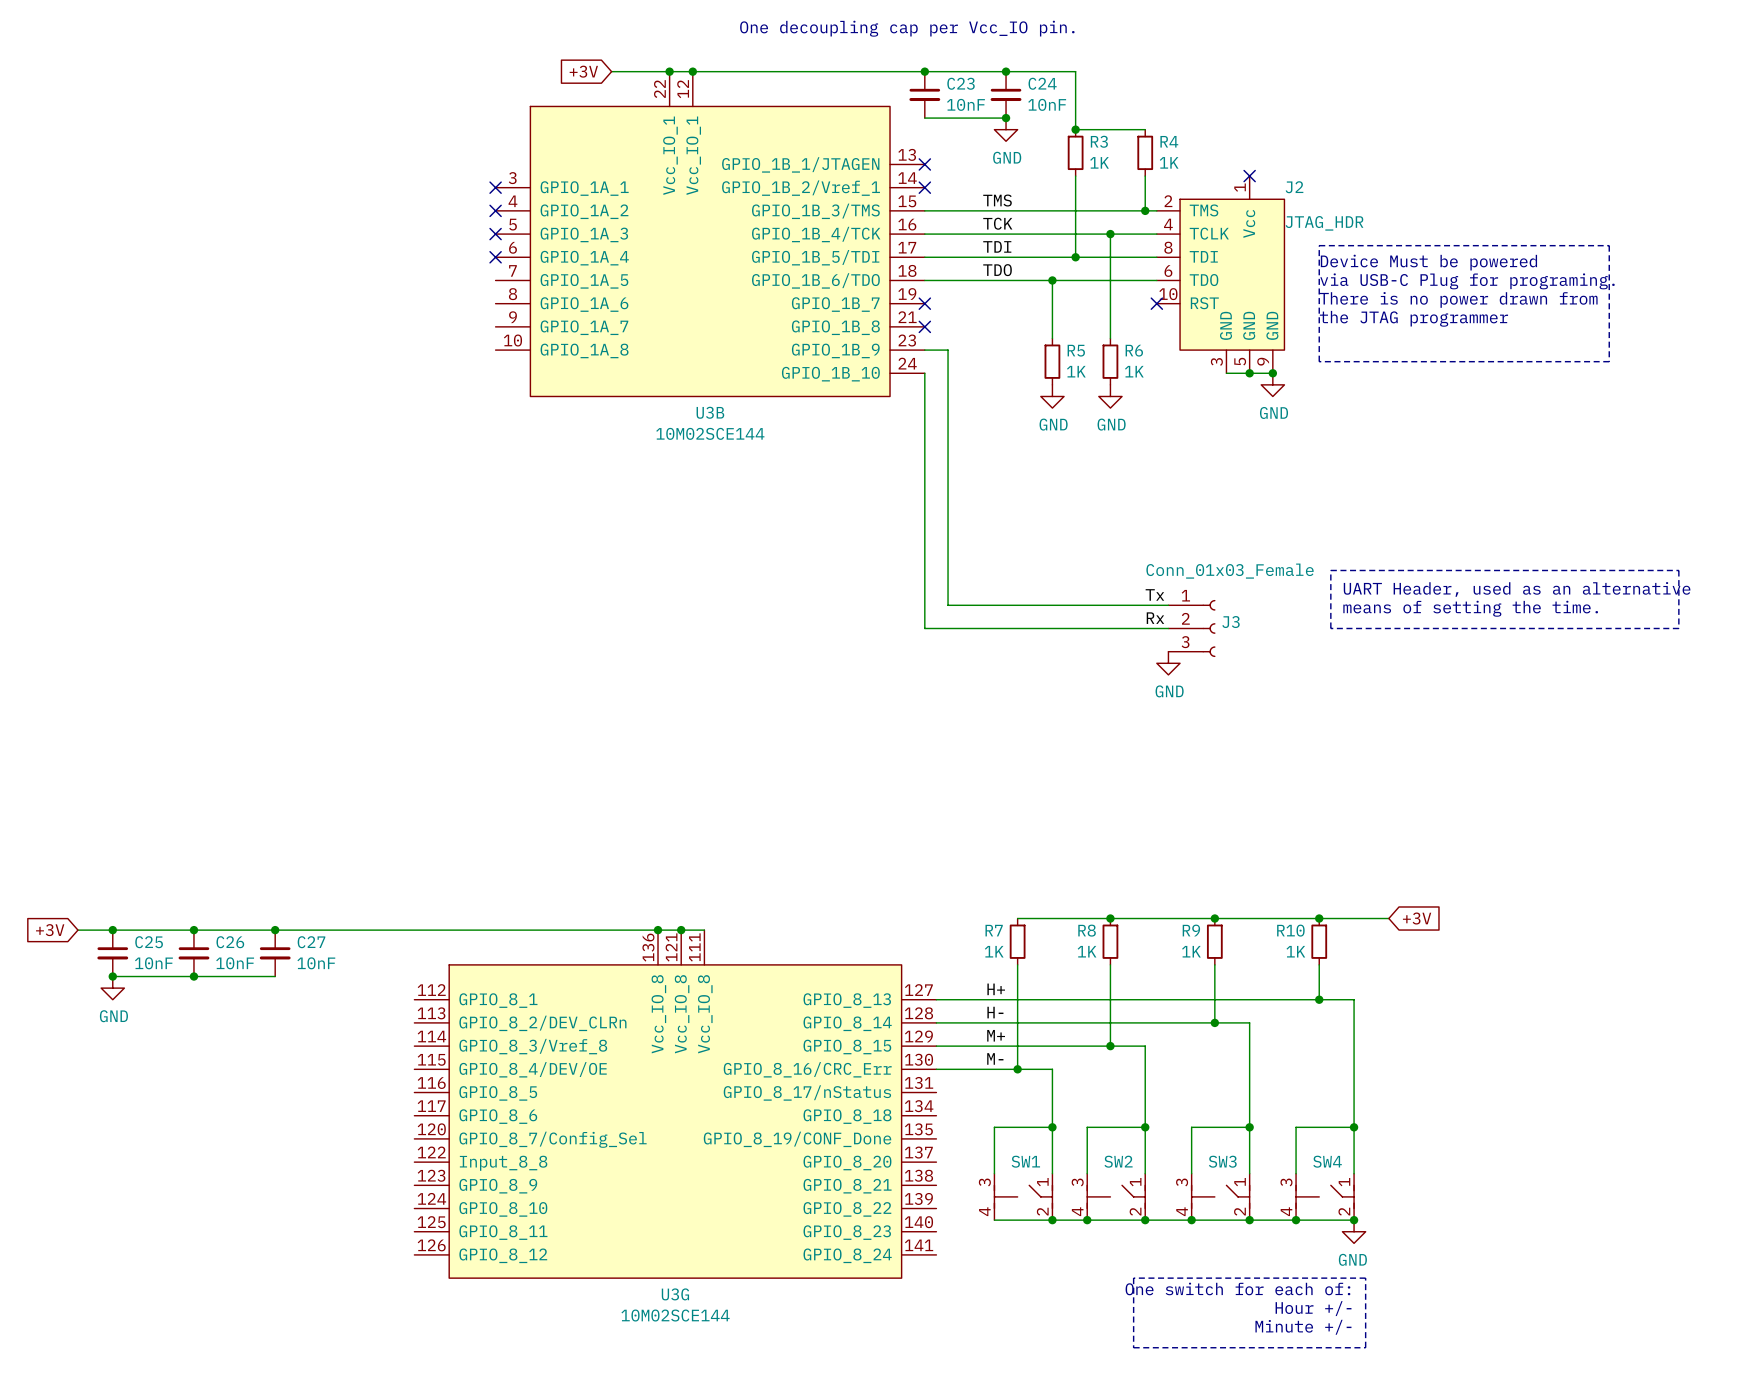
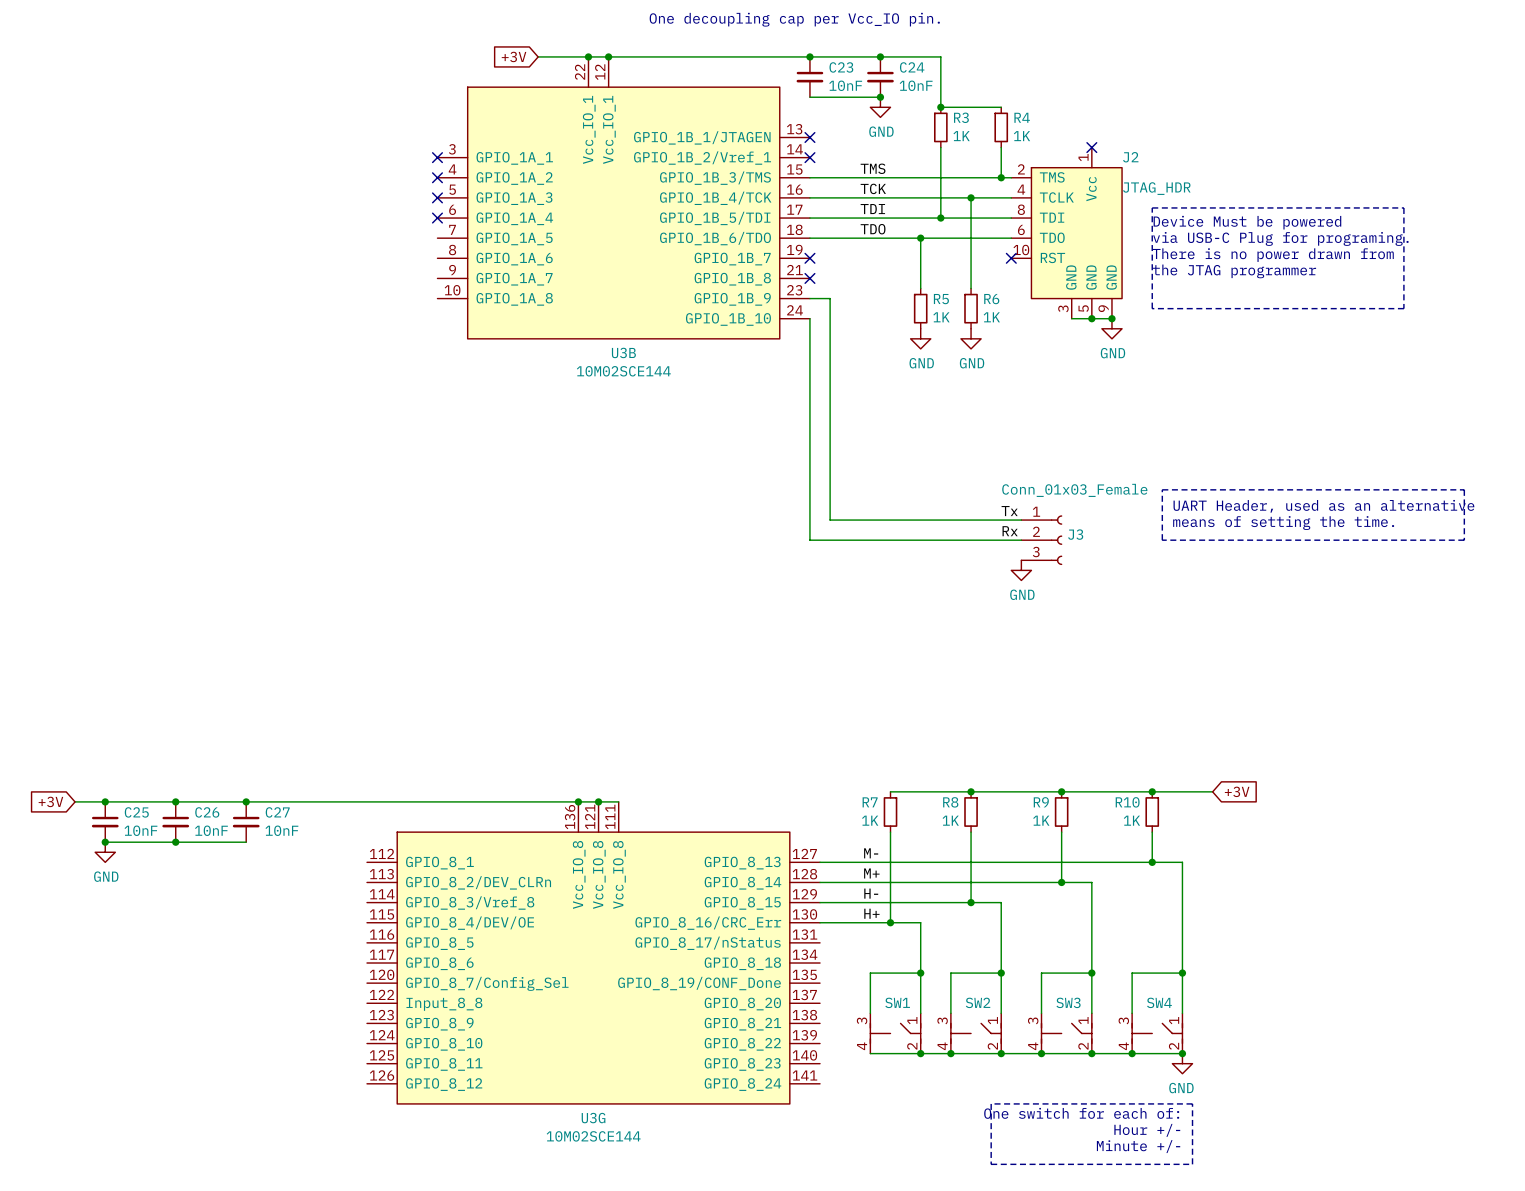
label: H+ (996, 989) -> M- (871, 853)
label: H- (995, 1012) -> M+ (871, 873)
label: M+ (996, 1035) -> H- (871, 893)
label: M- (995, 1058) -> H+ (871, 913)

